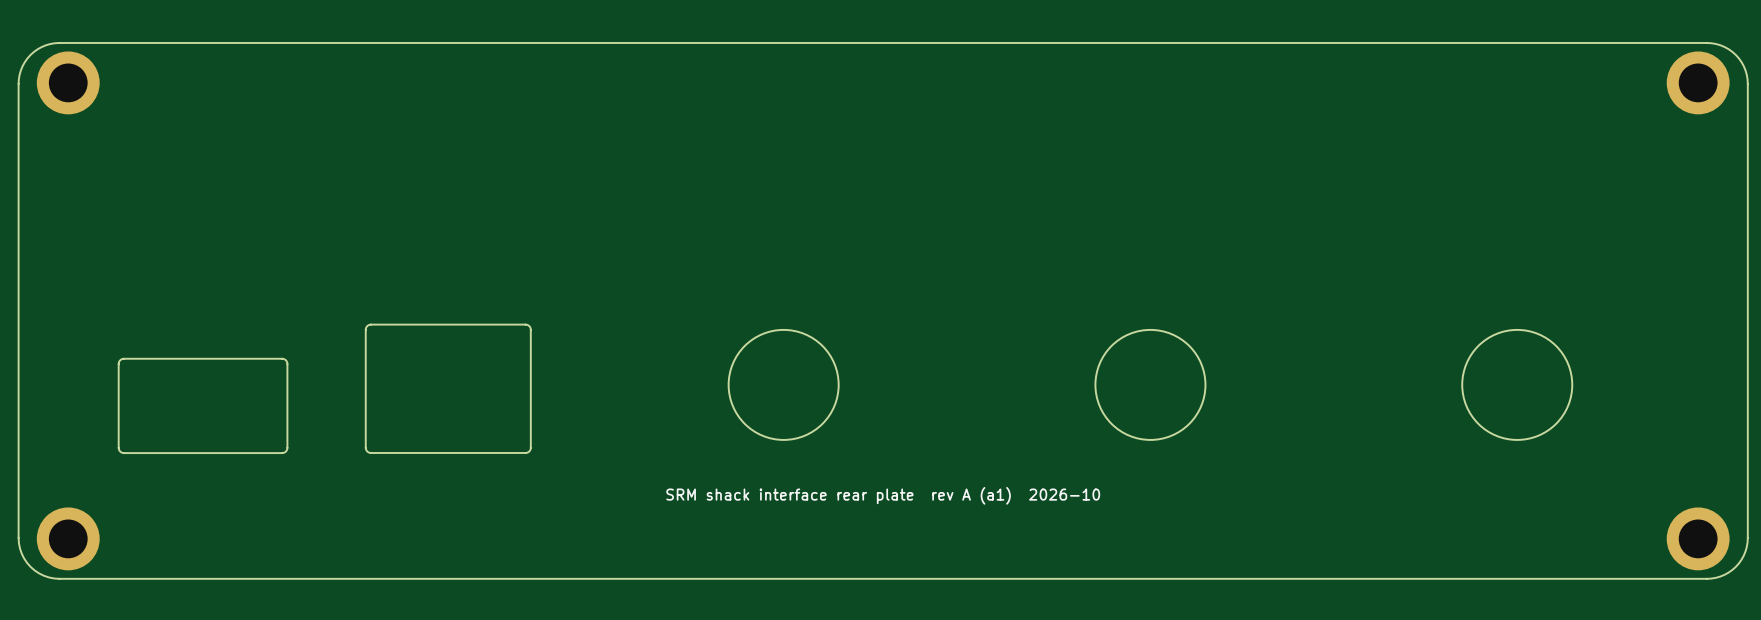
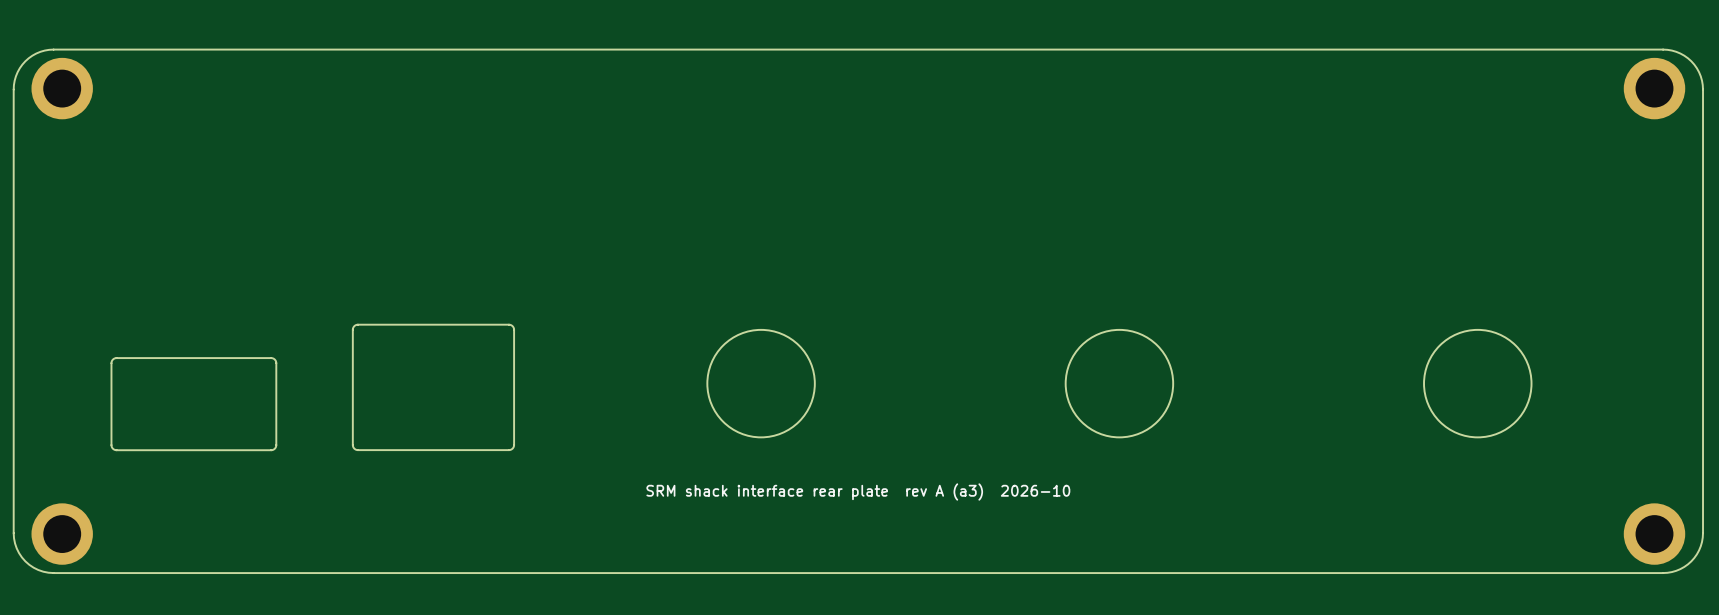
text: SRM shack interface rear plate rev A (a1) 2026-10 (883, 495) -> SRM shack interface rear plate rev A (a3) 2026-10 (858, 491)

